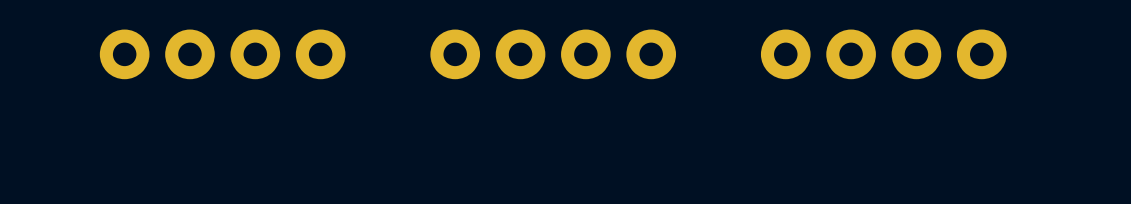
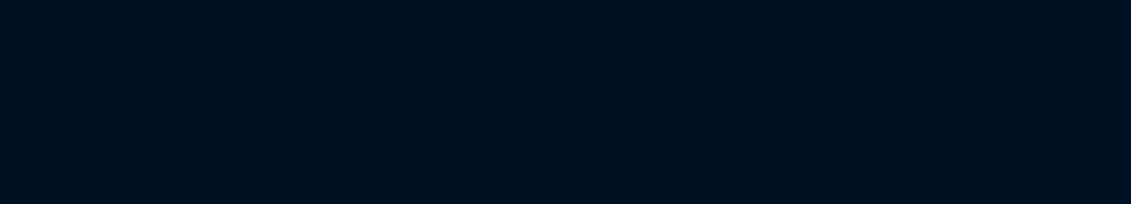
part: (222, 54) -> none
part: (553, 54) -> none
part: (883, 54) -> none

